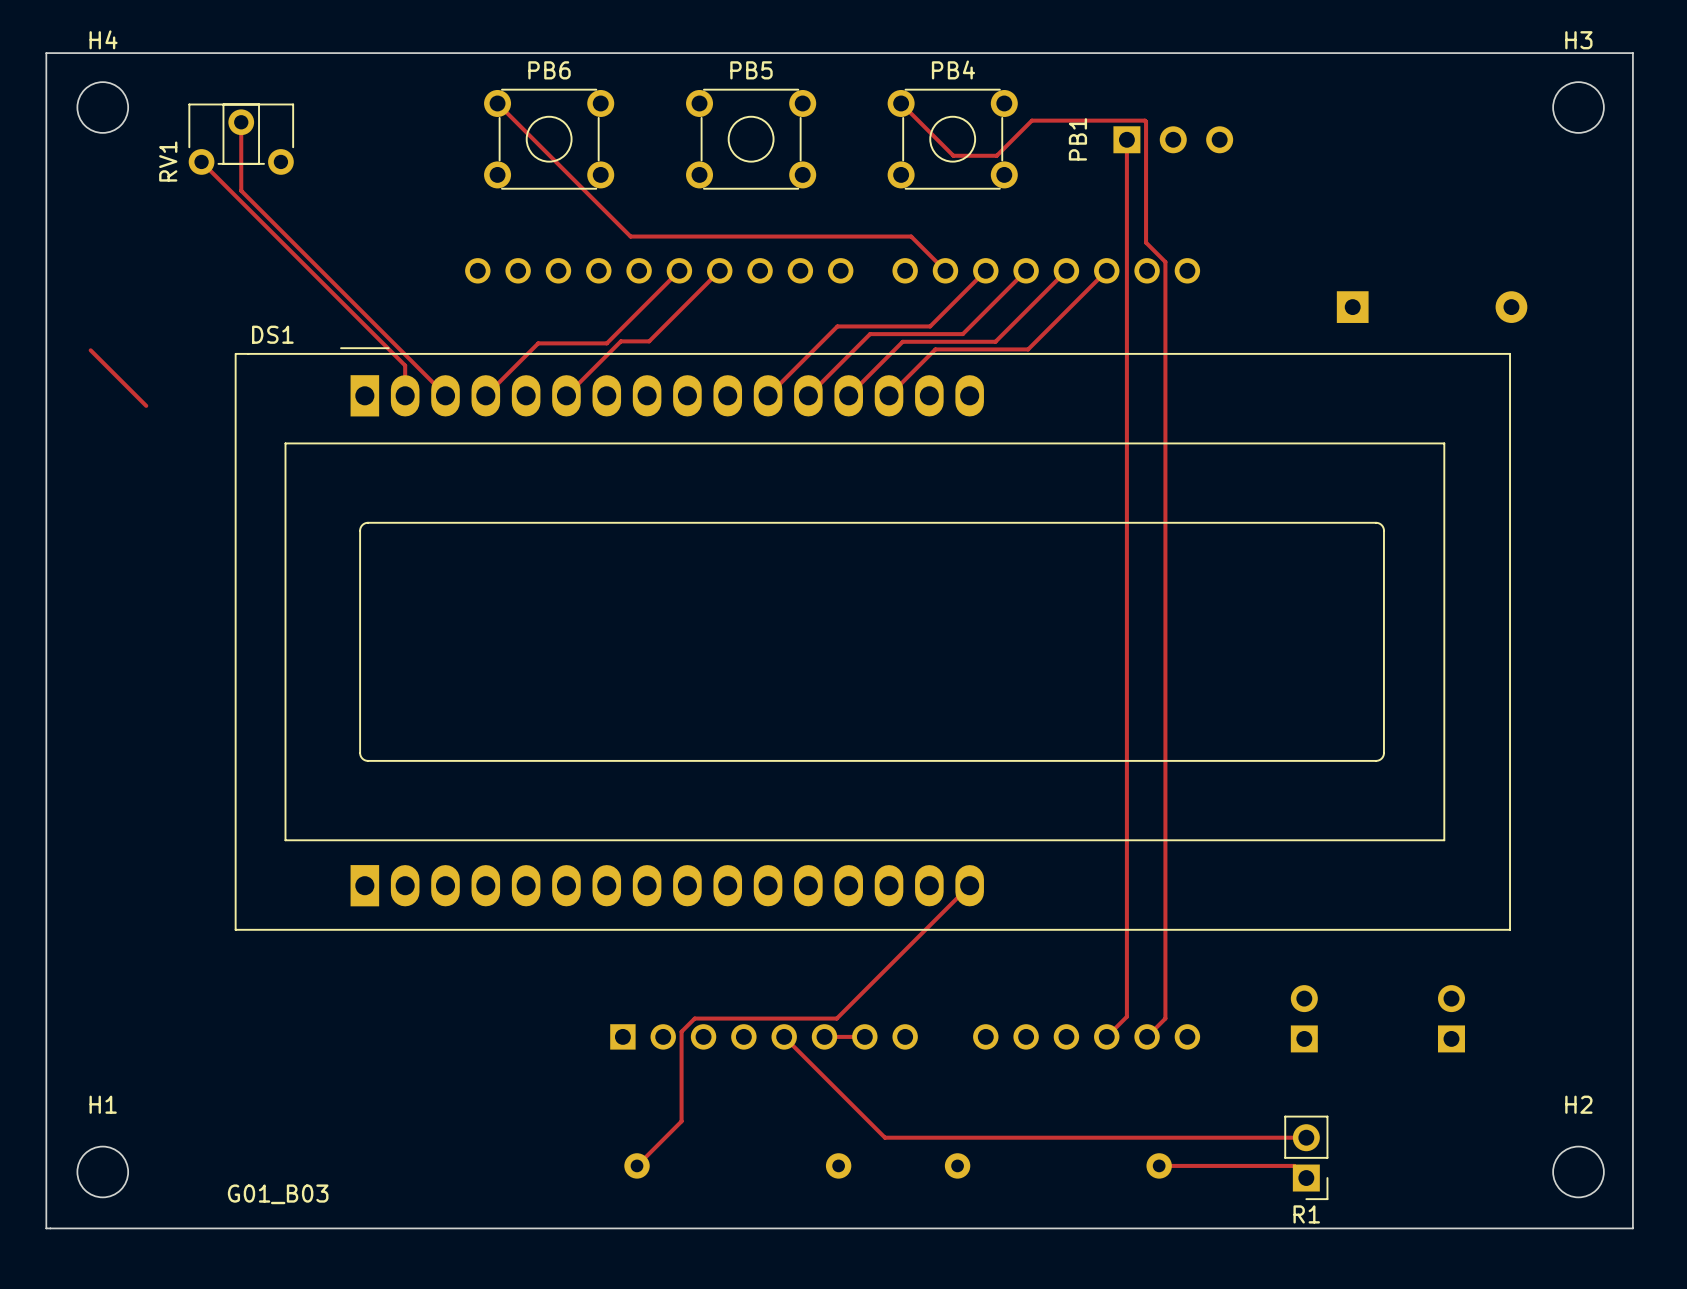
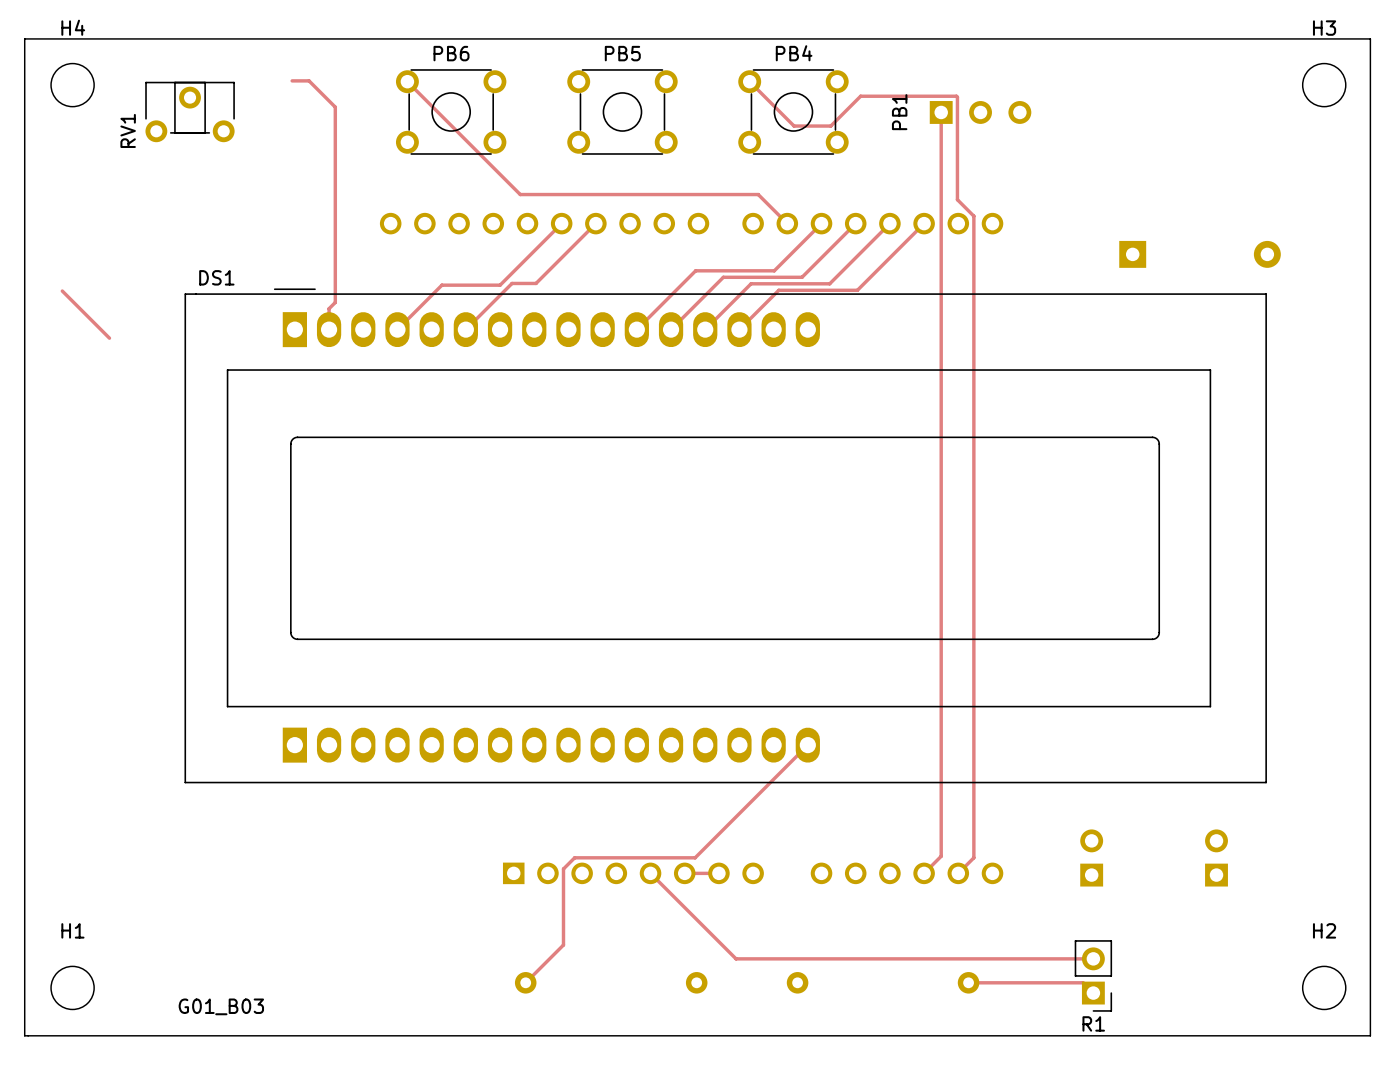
track: (241, 122) (241, 190) (445, 395) -> none
track: (201, 161) (405, 365) (405, 371) -> (292, 80) (309, 80) (335, 107) (335, 302) (329, 308)

